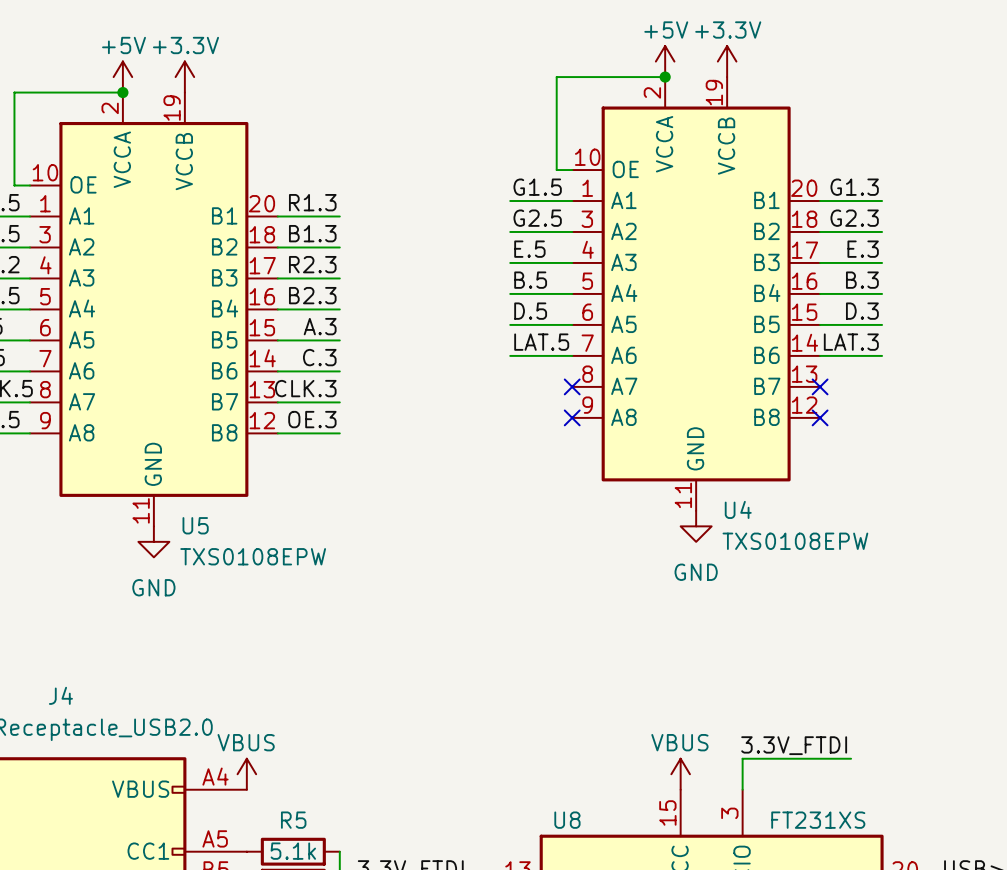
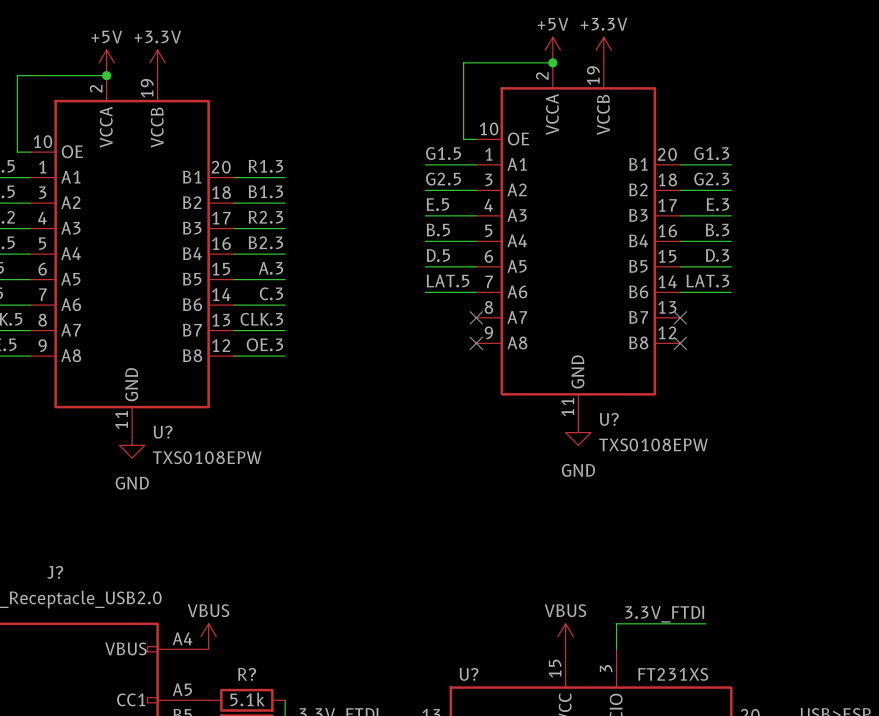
U4 name: U4 (738, 509) -> U? (609, 419)
U5 name: U5 (195, 525) -> U? (163, 432)
J4 name: J4 (60, 695) -> J? (55, 572)
R5 name: R5 (293, 820) -> R? (247, 674)
U8 name: U8 (567, 820) -> U? (469, 674)

